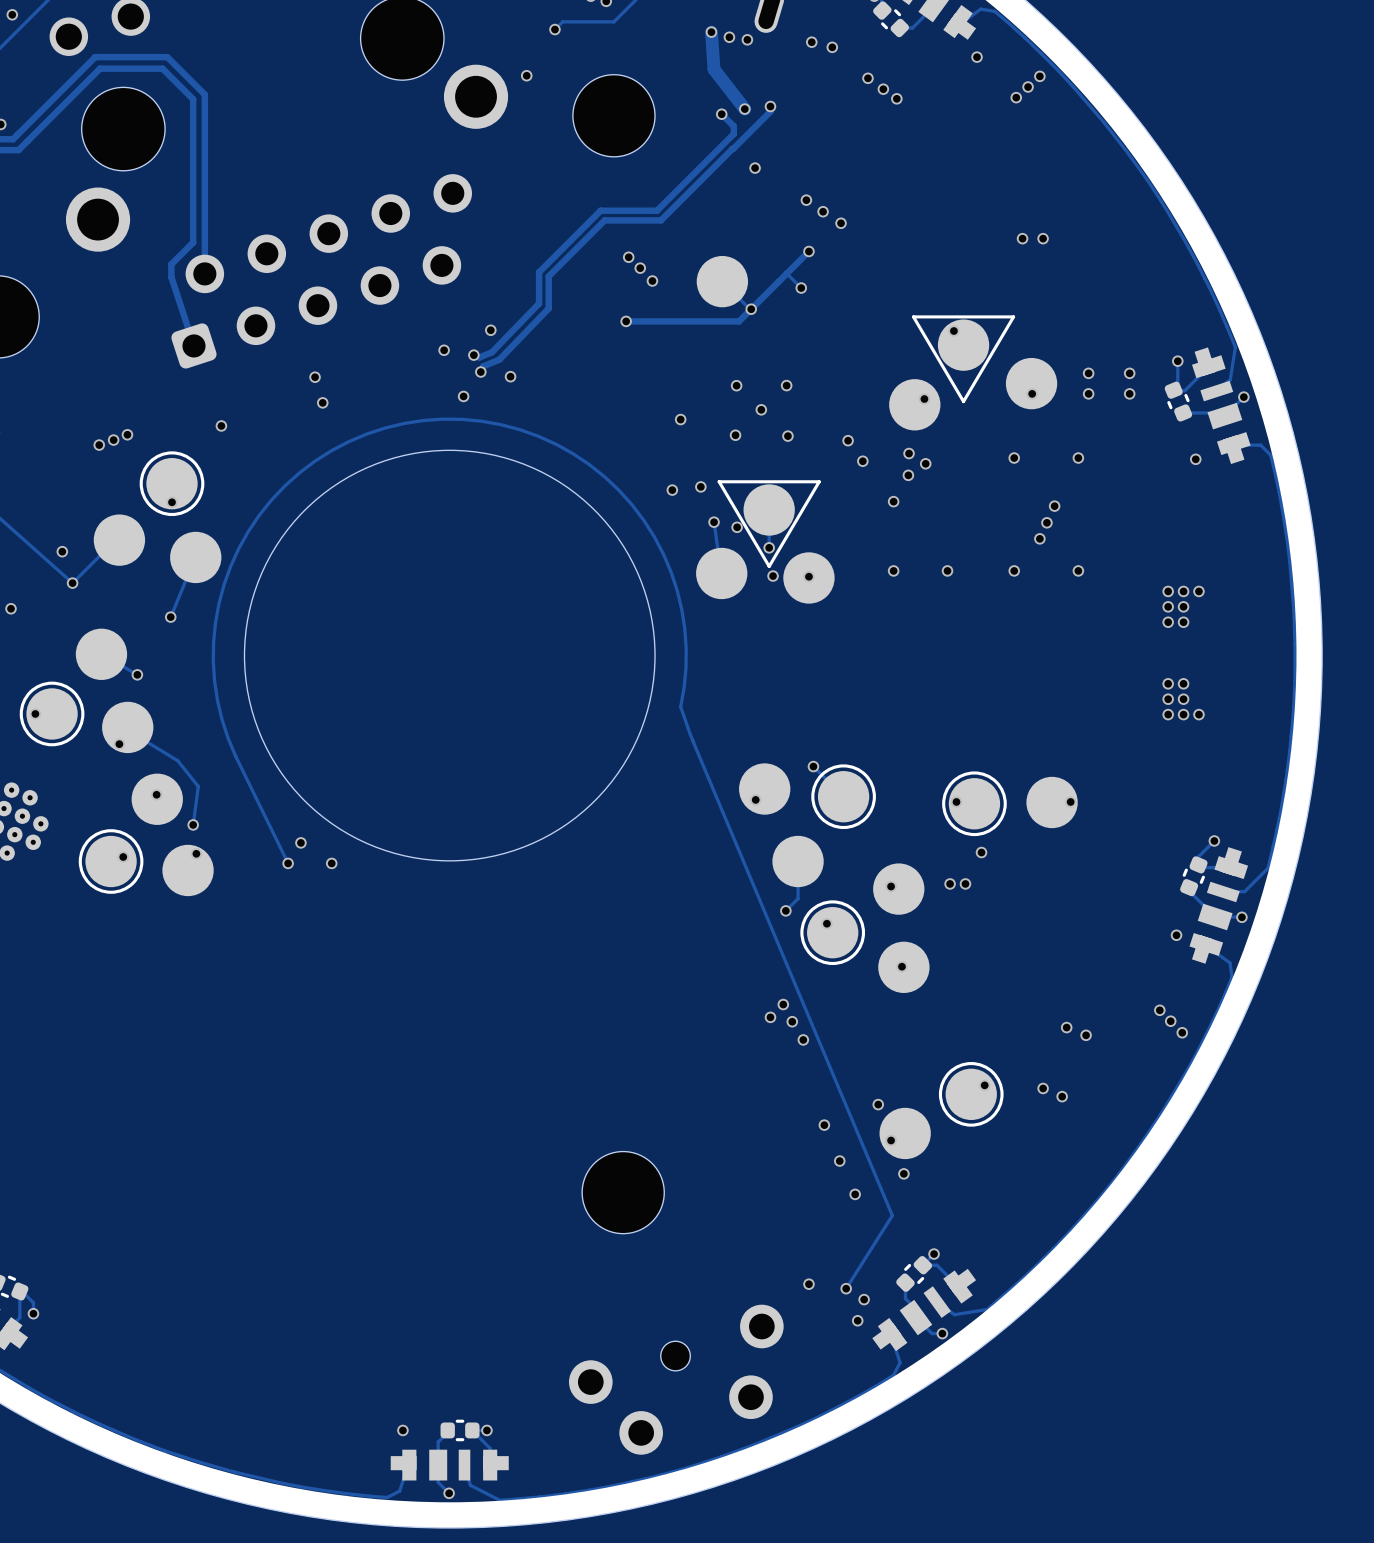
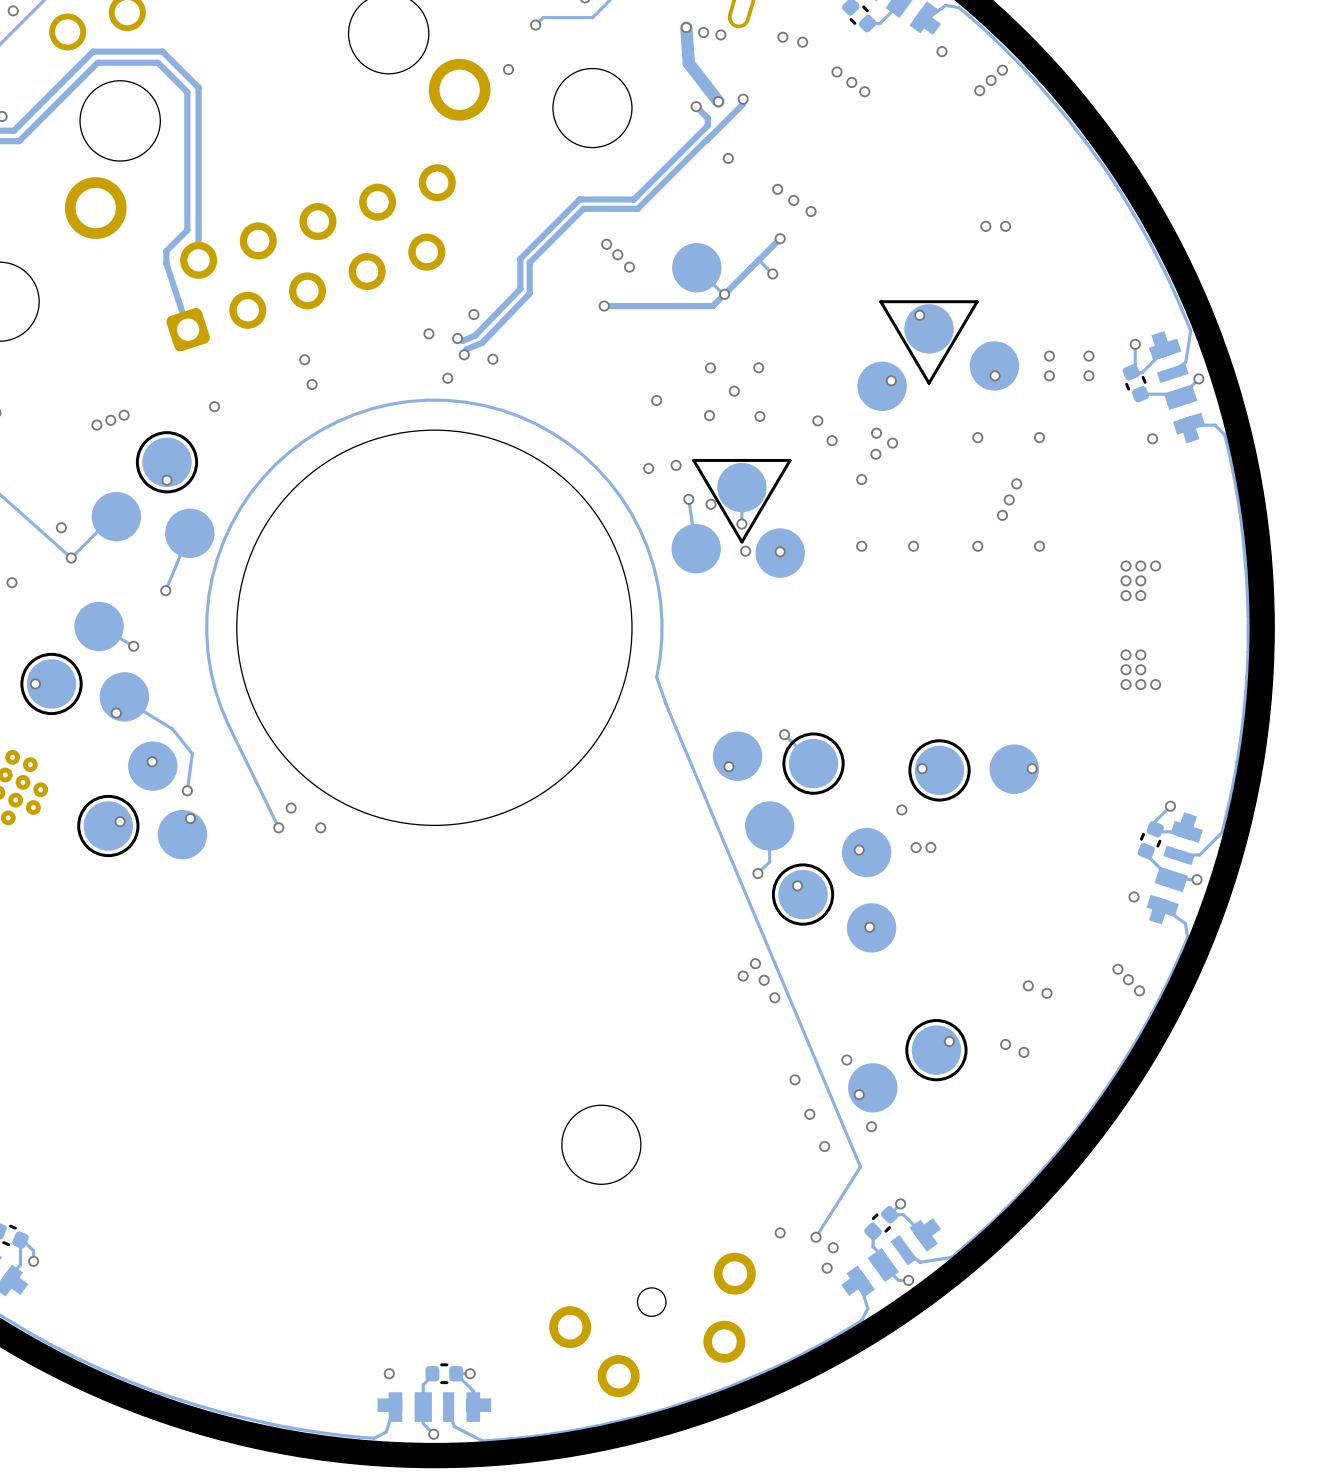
via position: (981, 852) -> (901, 809)

